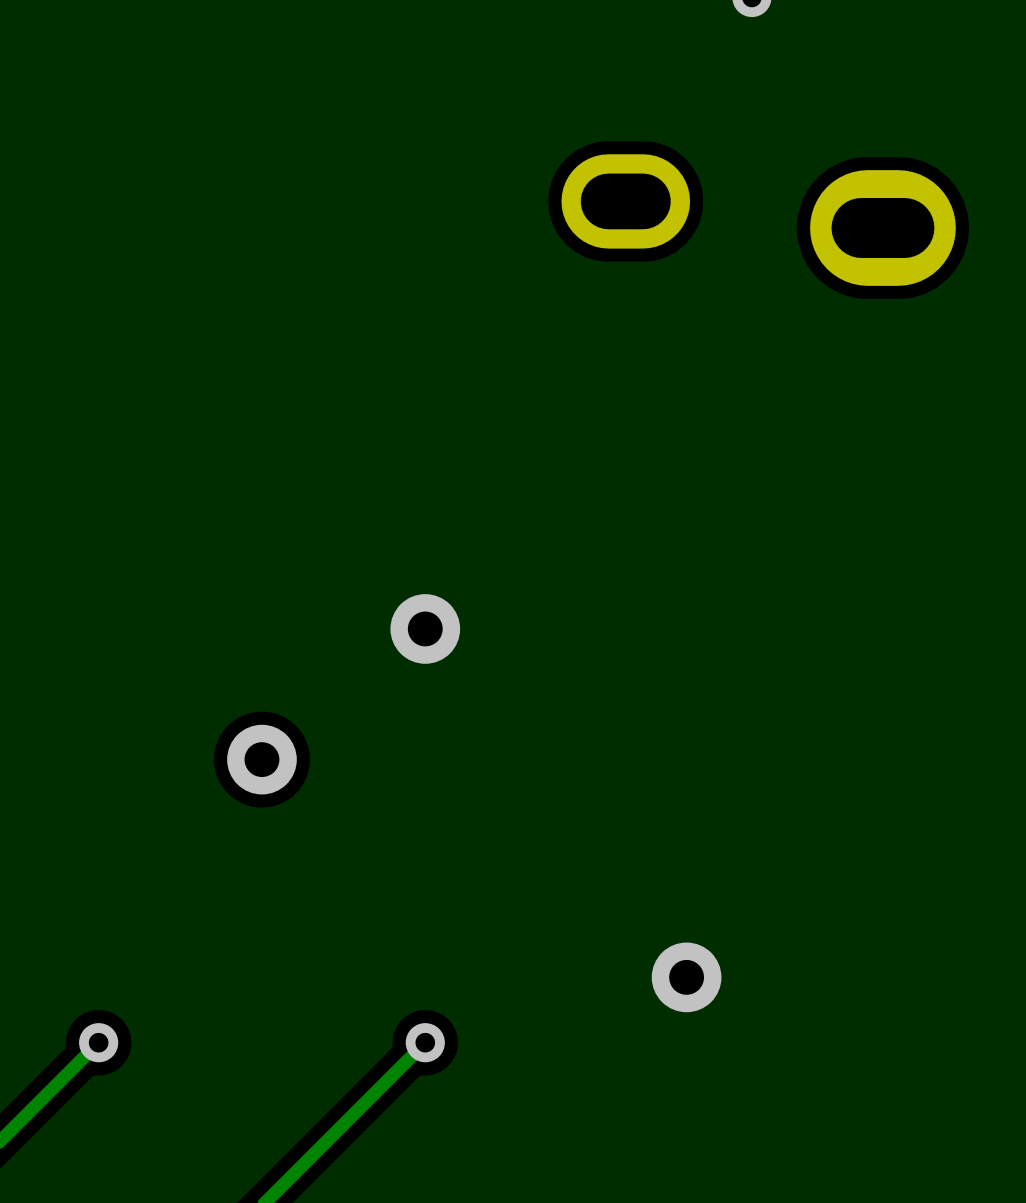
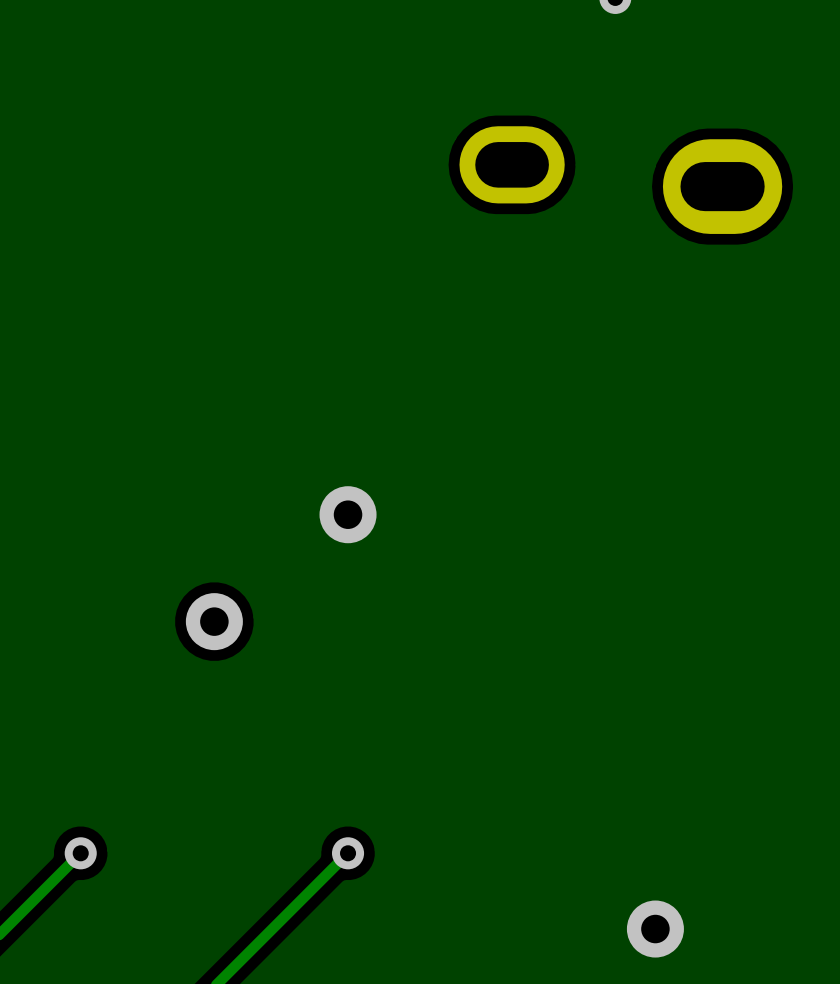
via position: (686, 977) -> (655, 929)

